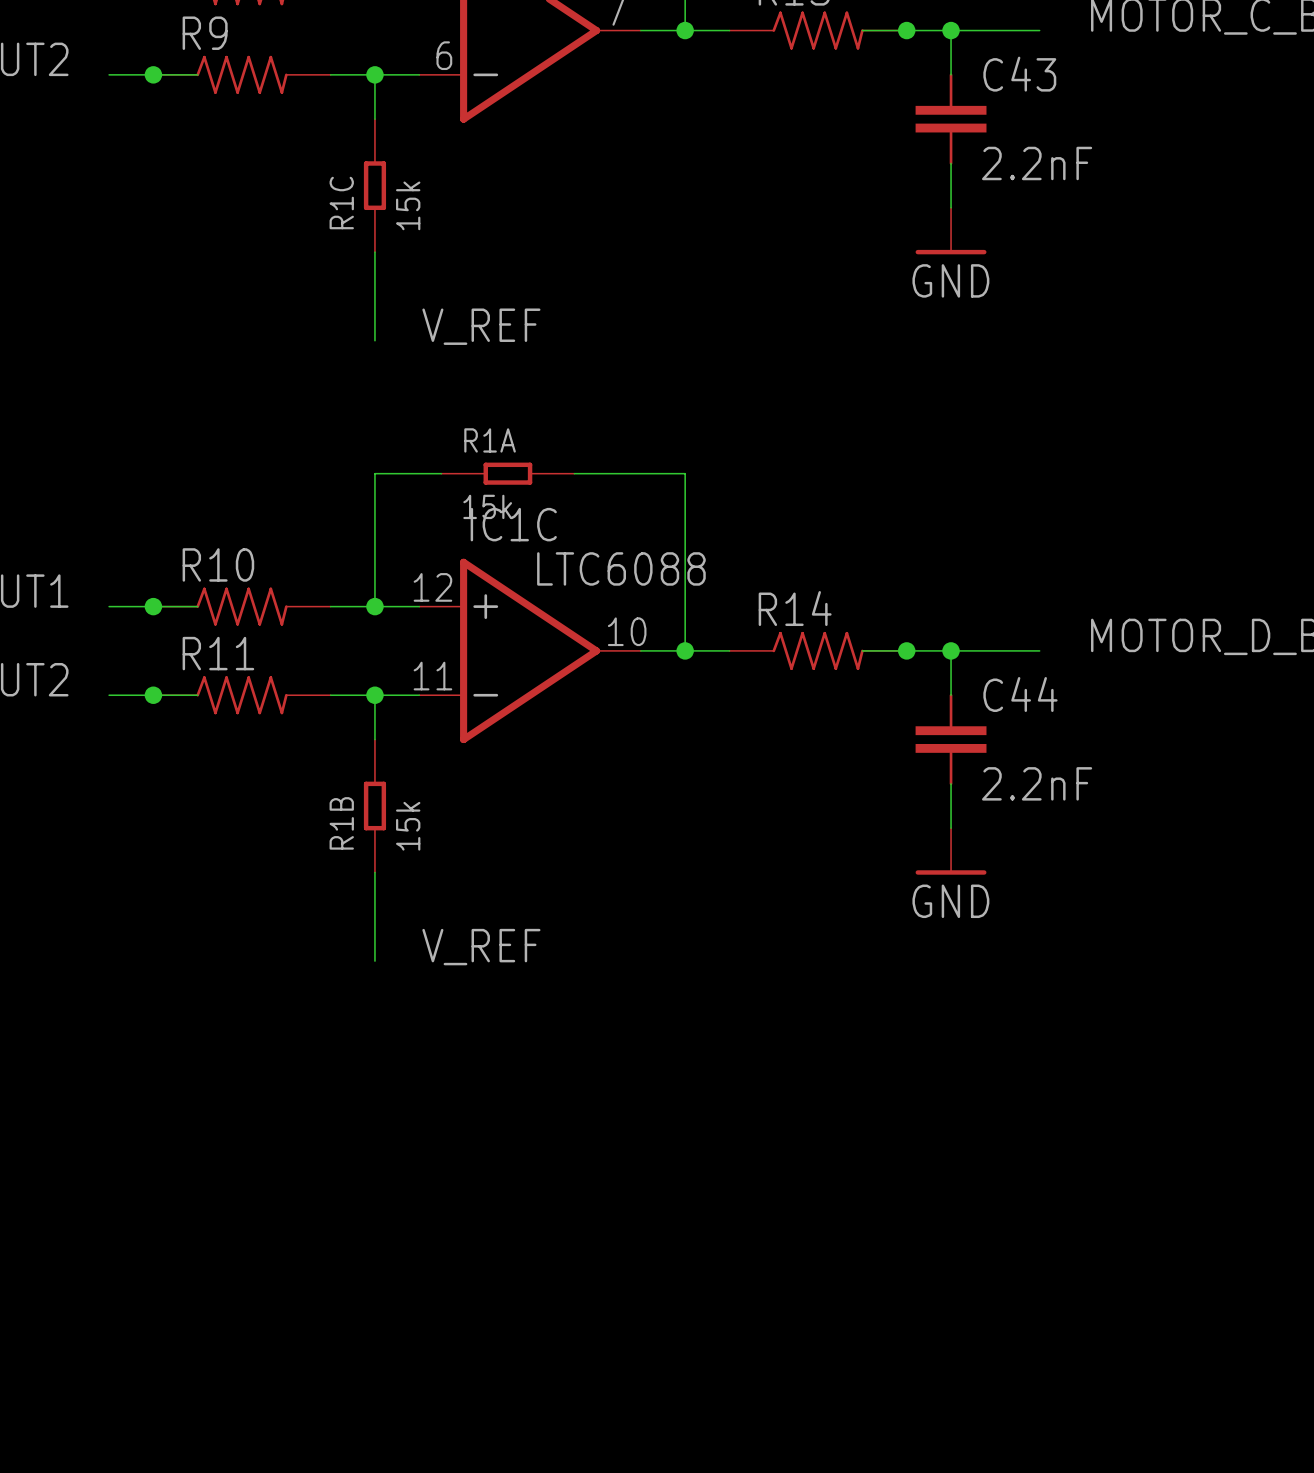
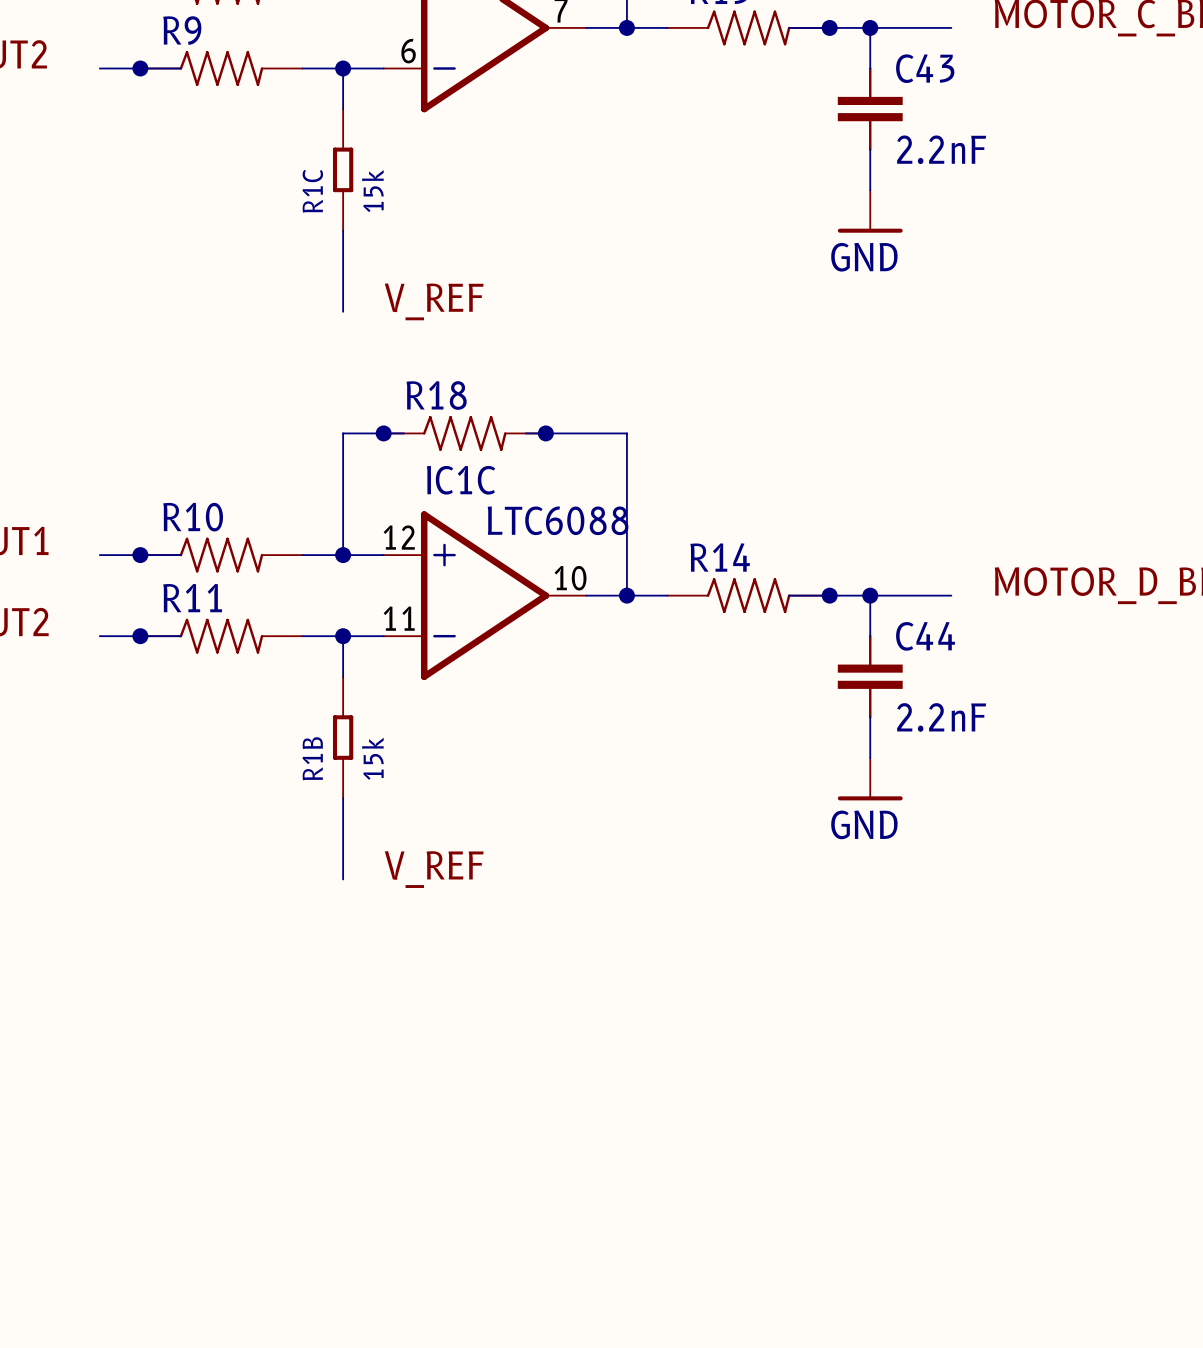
junction: none -> (383, 433)
R1A: 15k (507, 473) -> none
R18: none -> (464, 433)
junction: none -> (545, 433)

